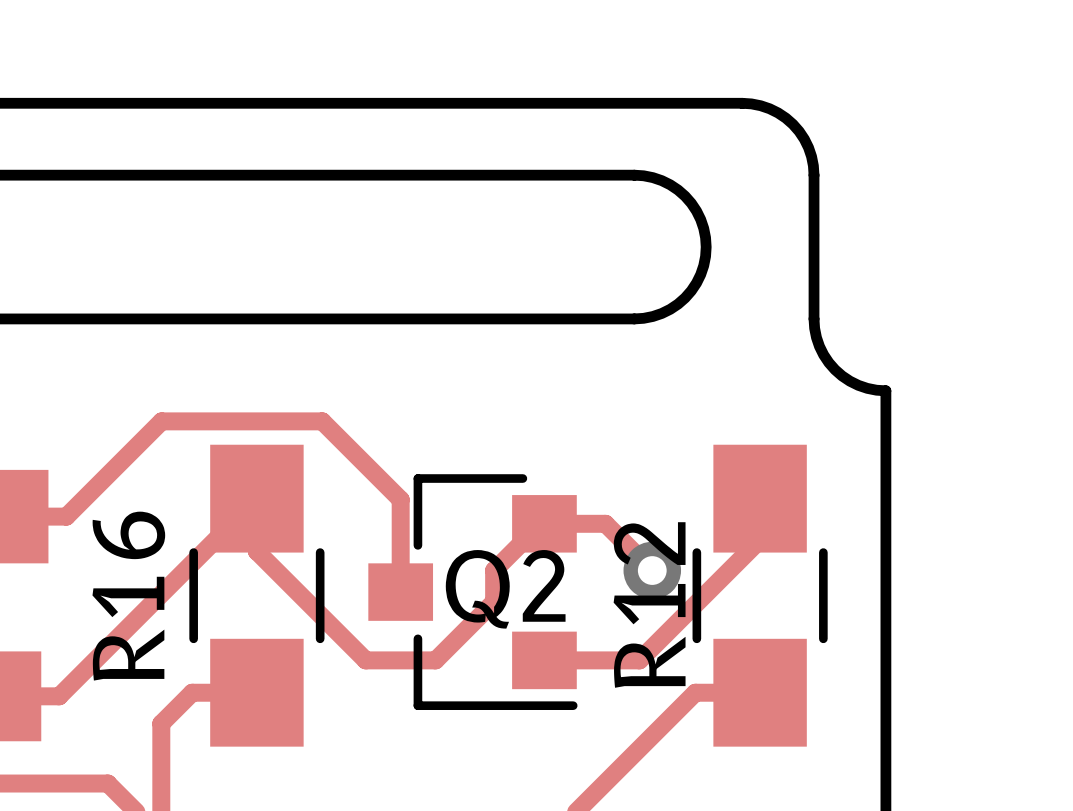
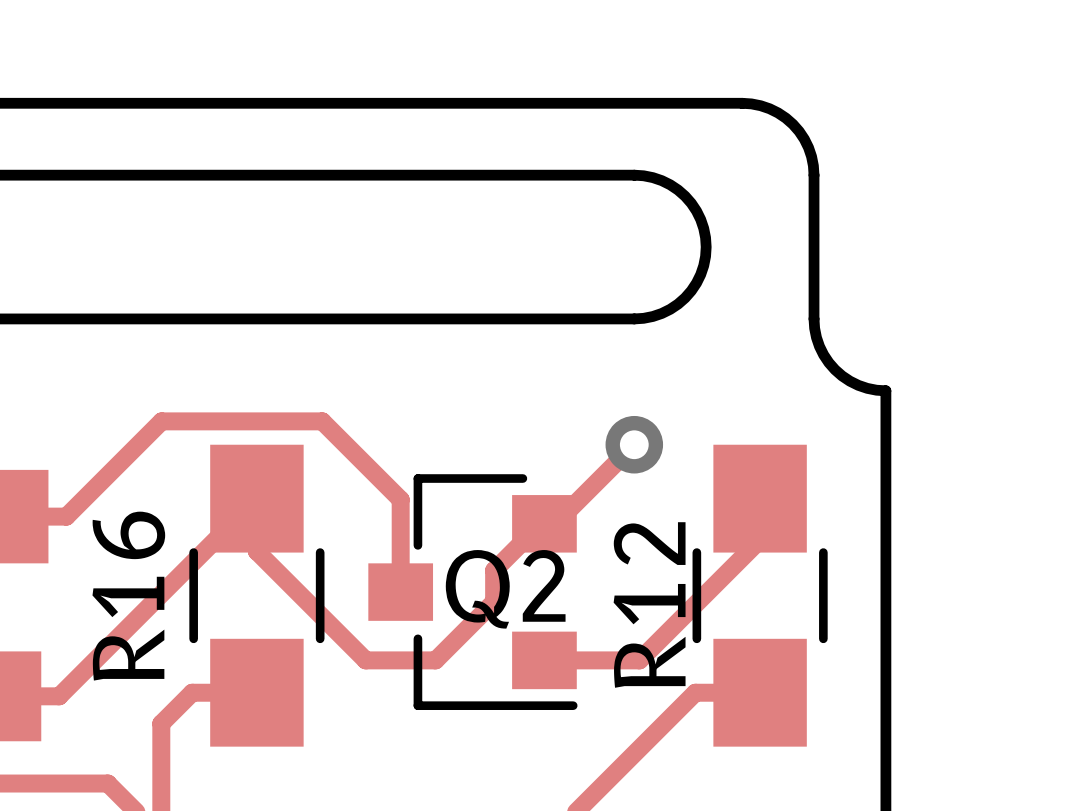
track: (555, 523) (605, 523) (652, 570) -> (555, 523) (634, 444)
via position: (652, 570) -> (634, 444)

